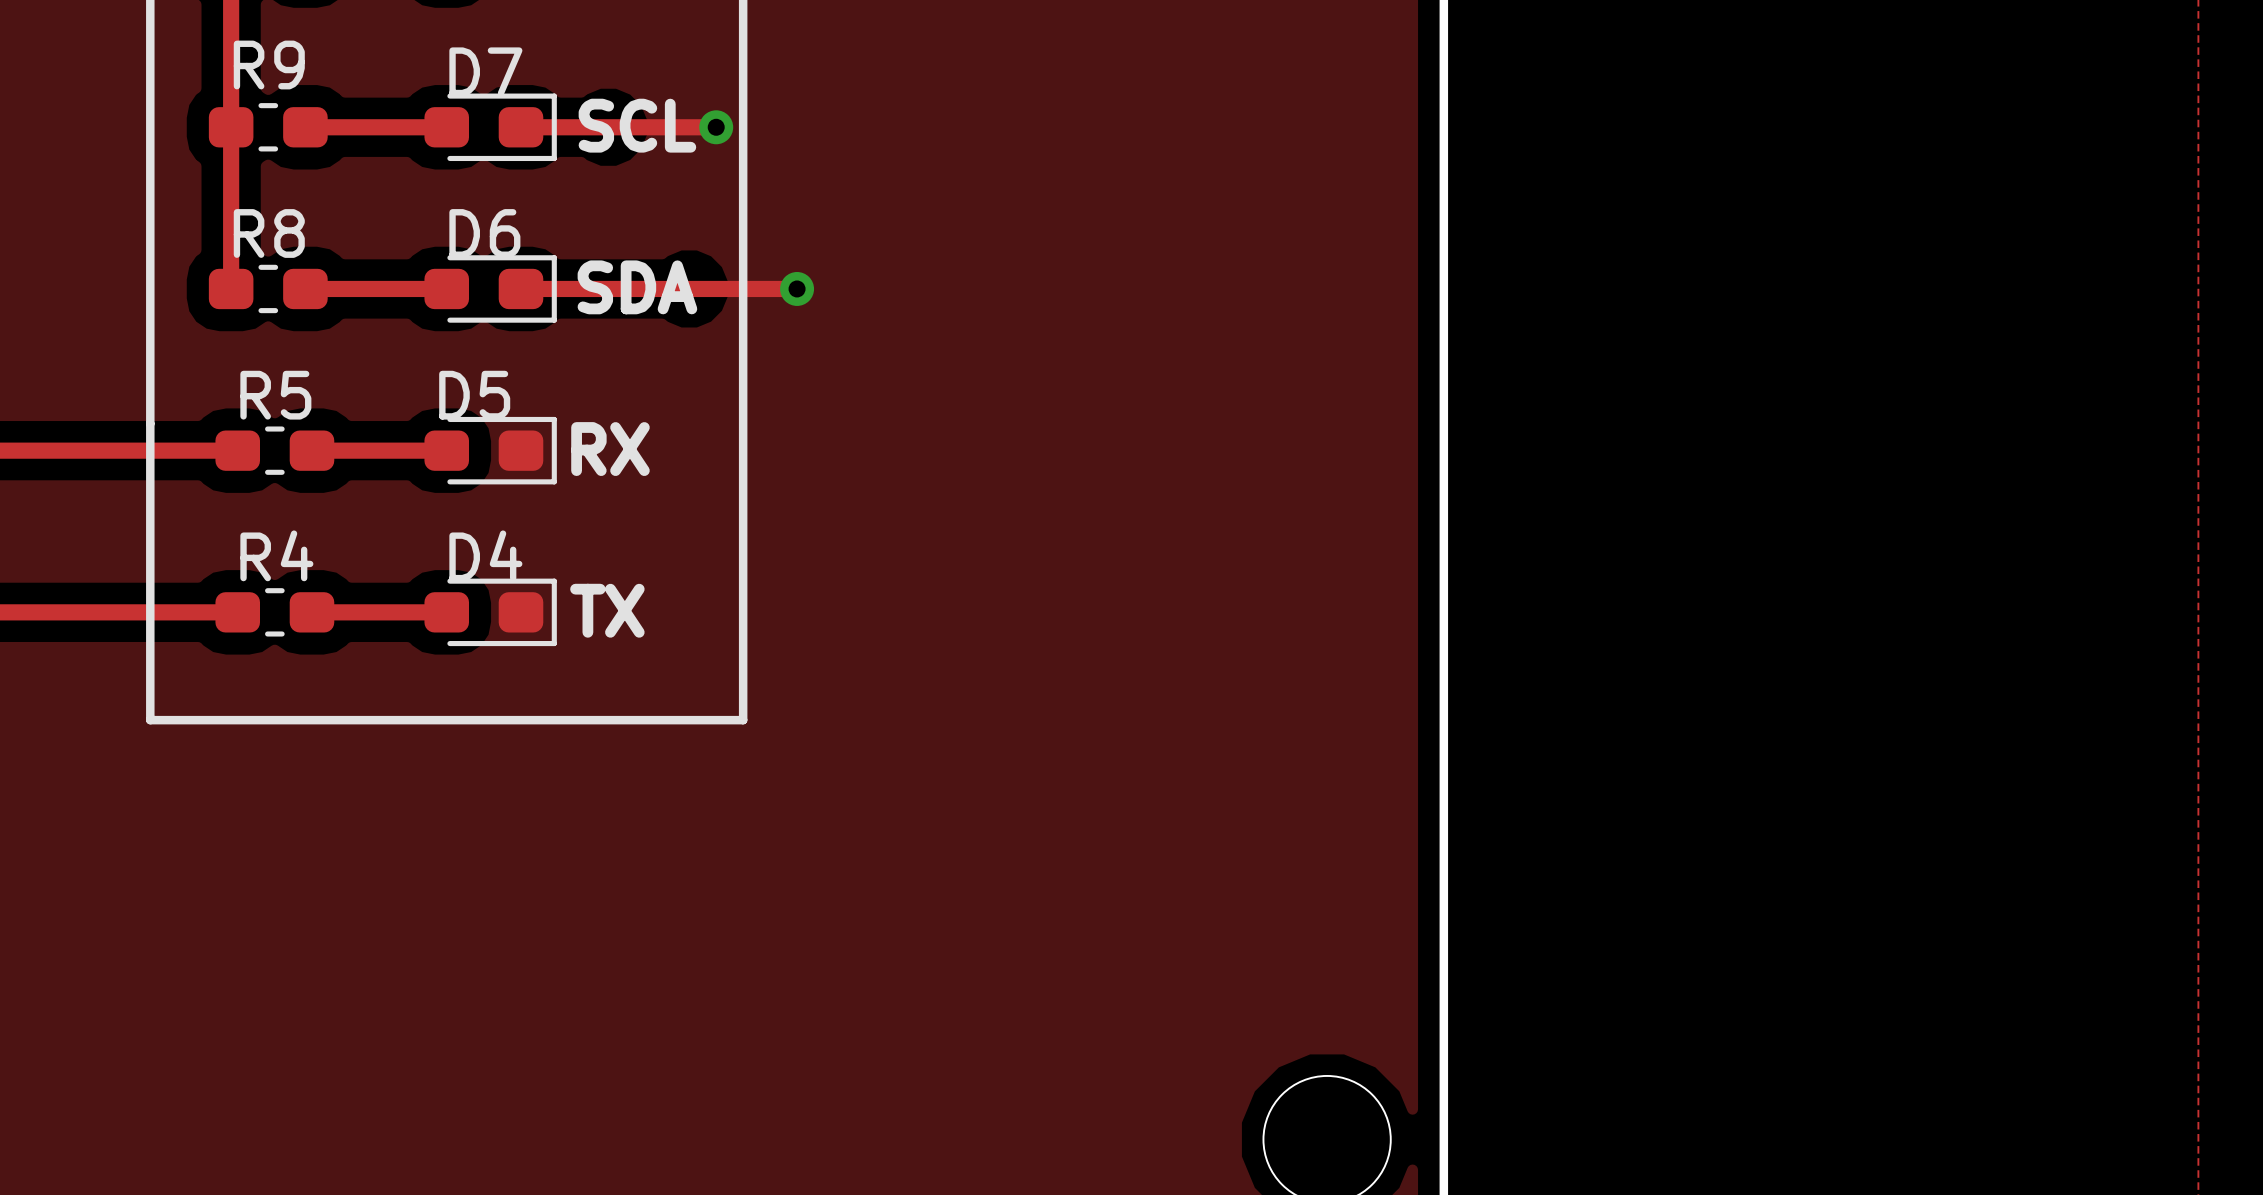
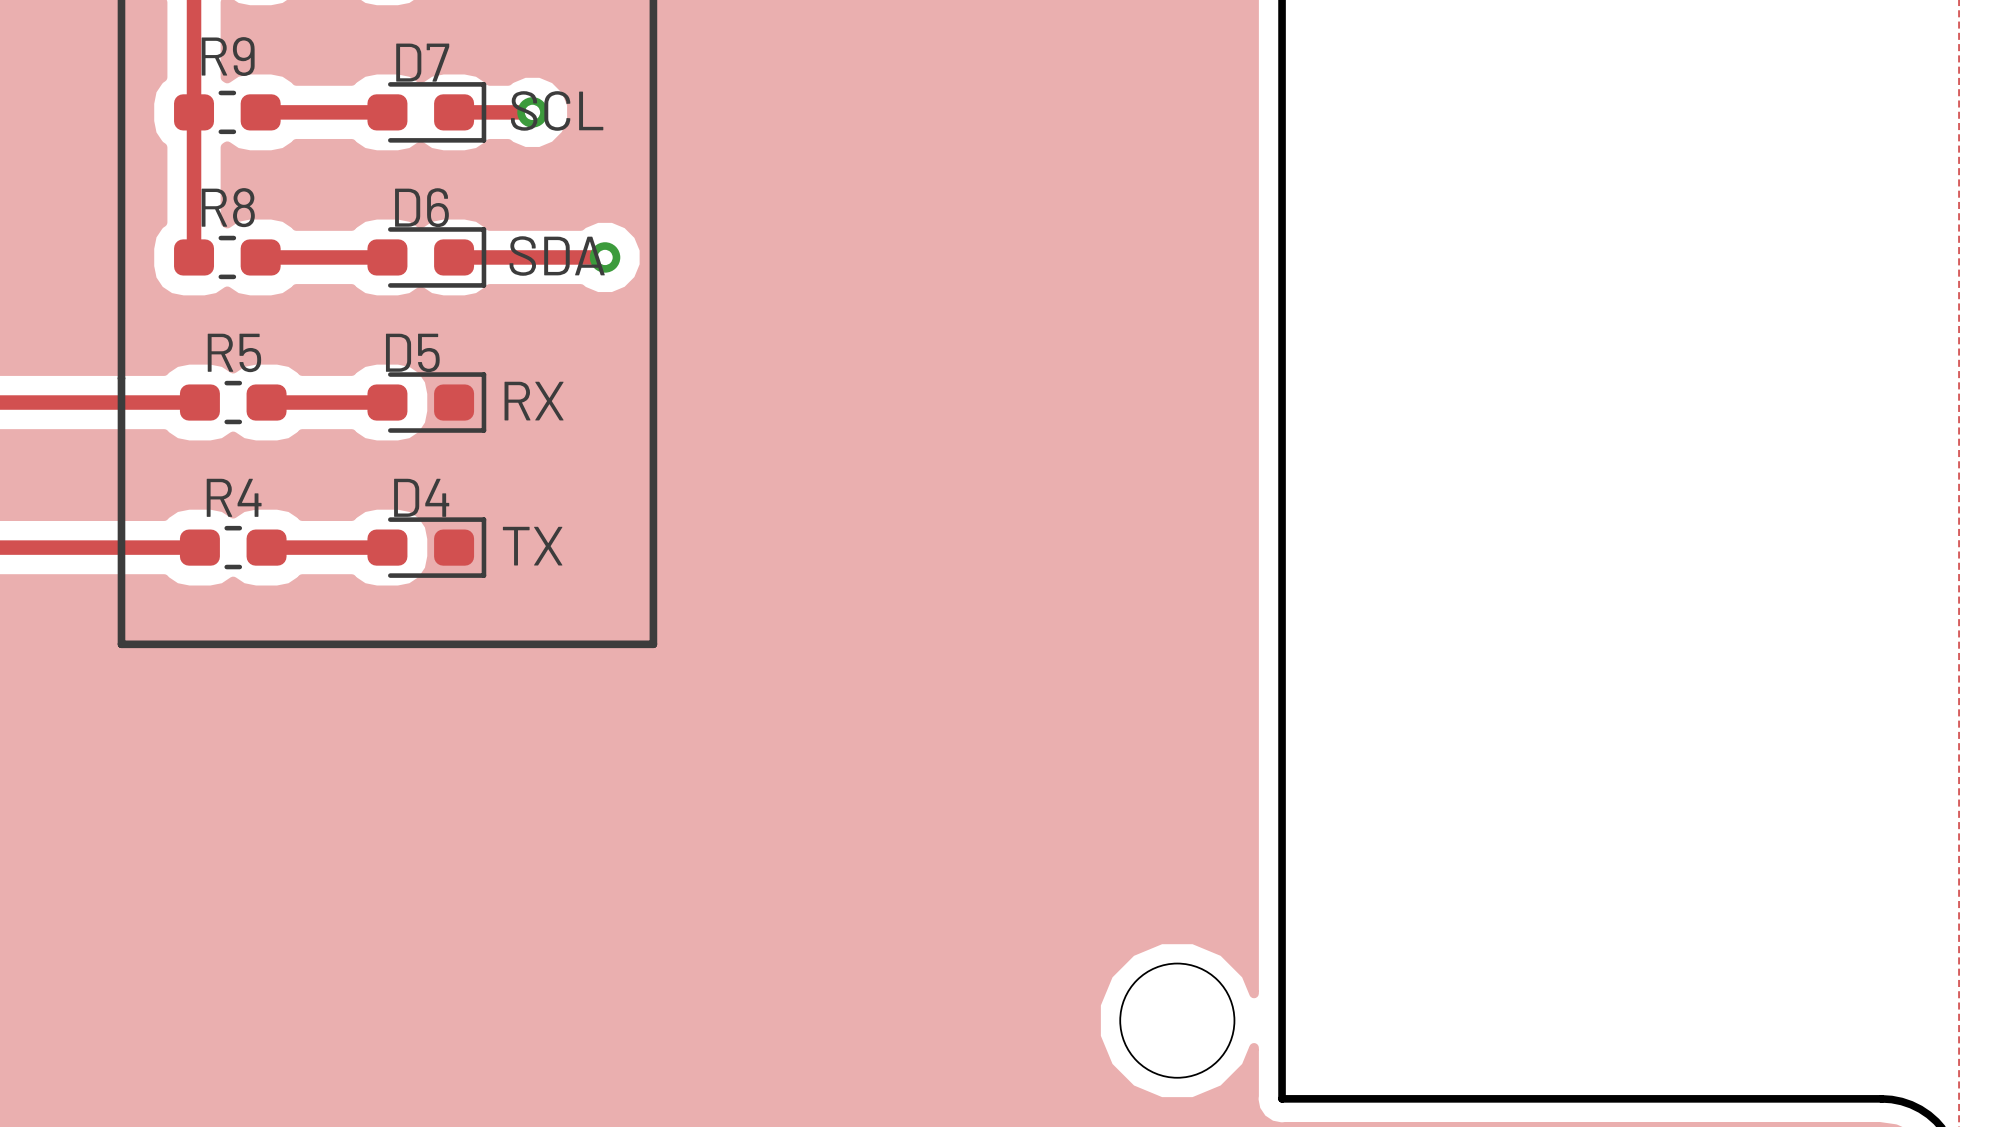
track: (608, 127) (716, 127) -> none
via: none -> (532, 112)
via: (716, 127) -> none
track: (689, 288) (797, 288) -> none
via: none -> (605, 257)
via: (797, 288) -> none

